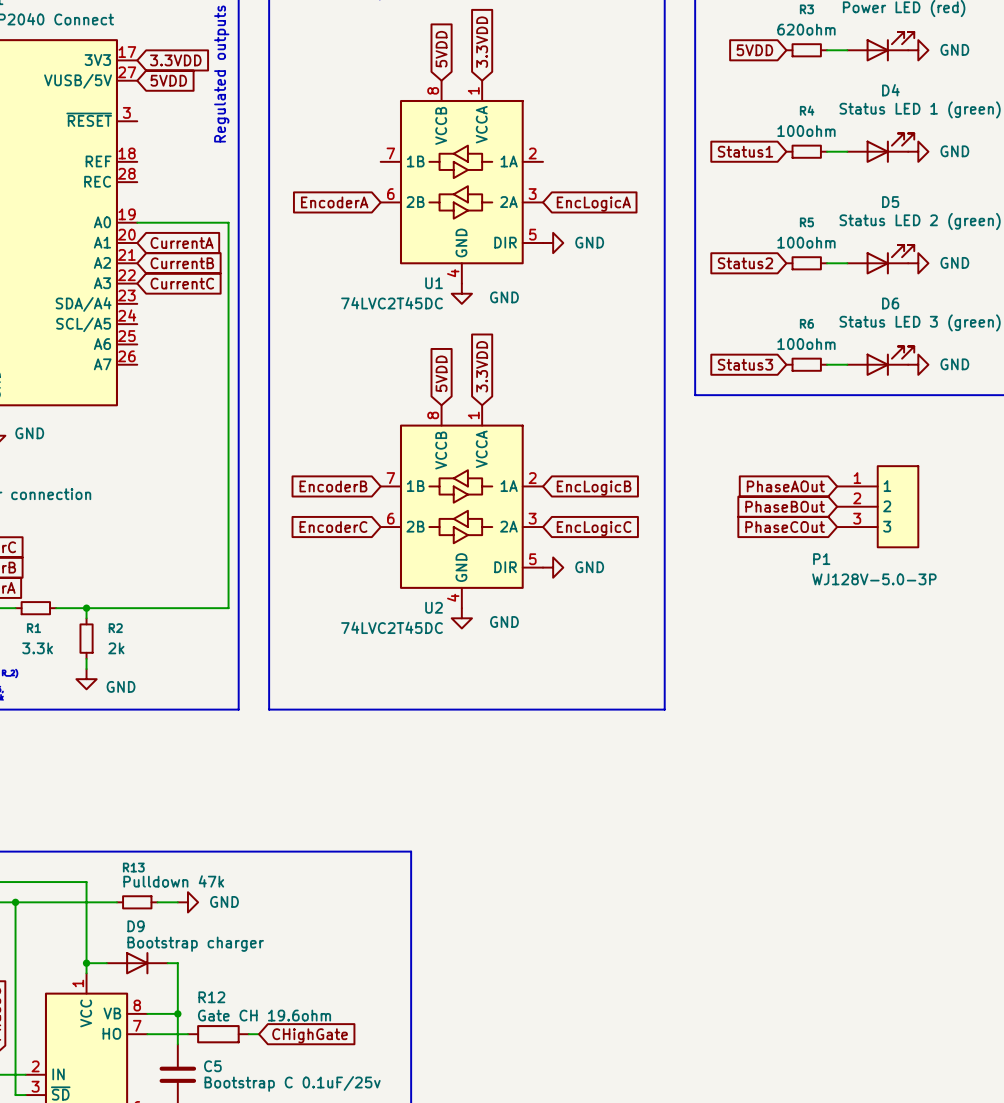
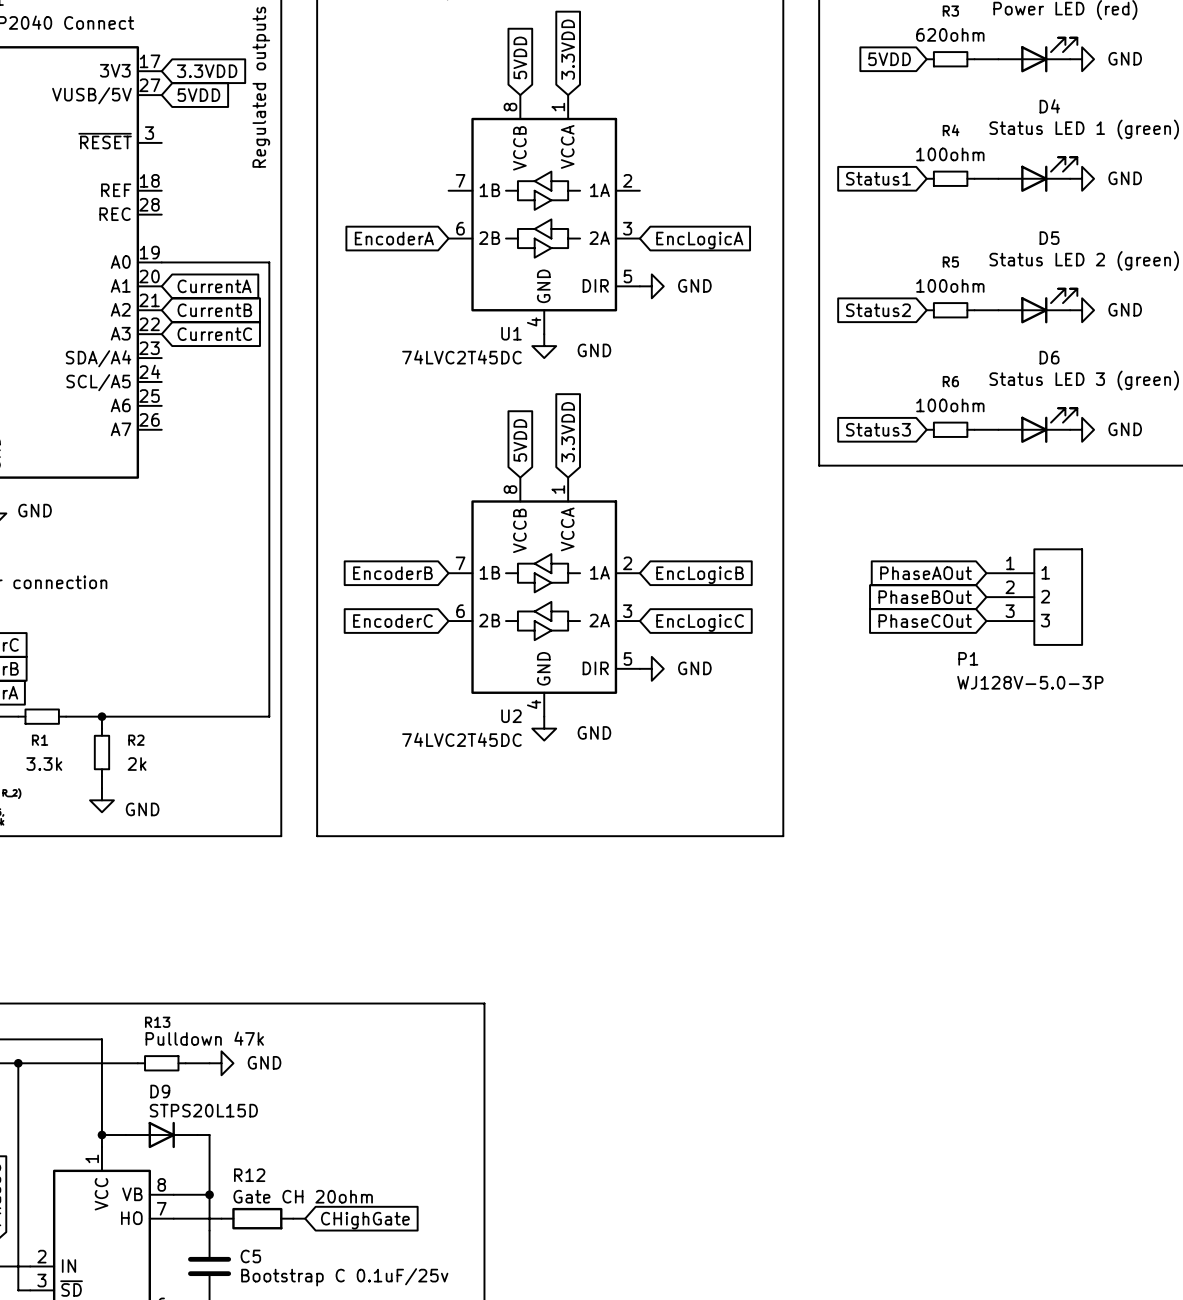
D9 value: Bootstrap charger (195, 944) -> STPS20L15D (203, 1110)
R12 value: Gate CH 19.6ohm (264, 1015) -> Gate CH 20ohm (303, 1196)

